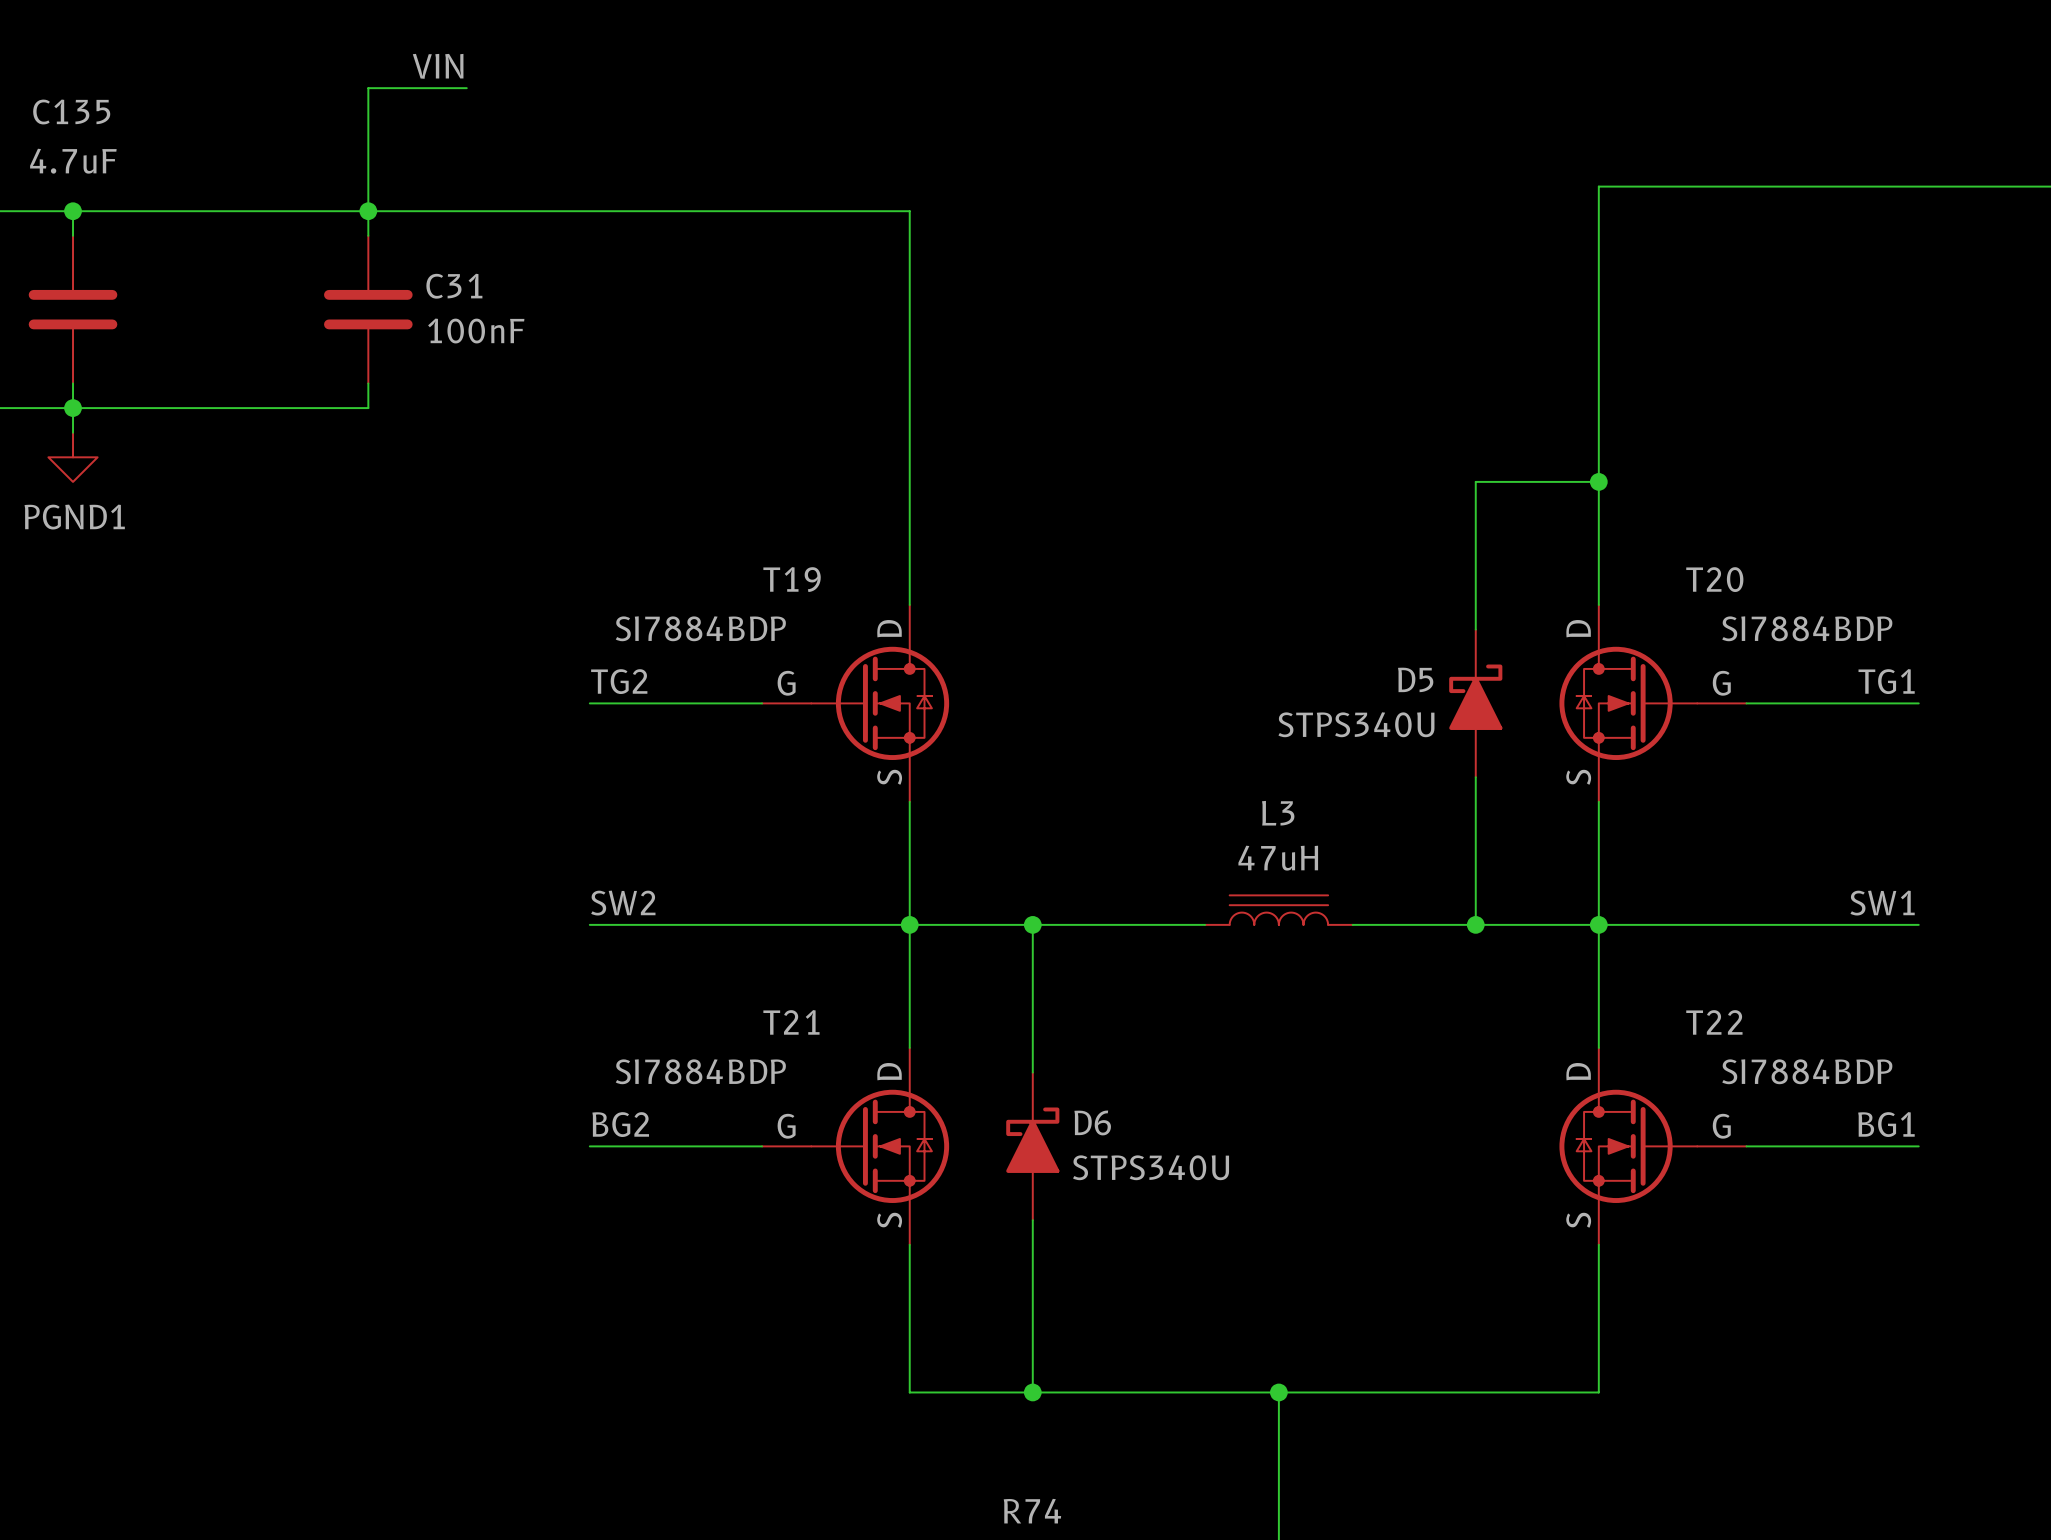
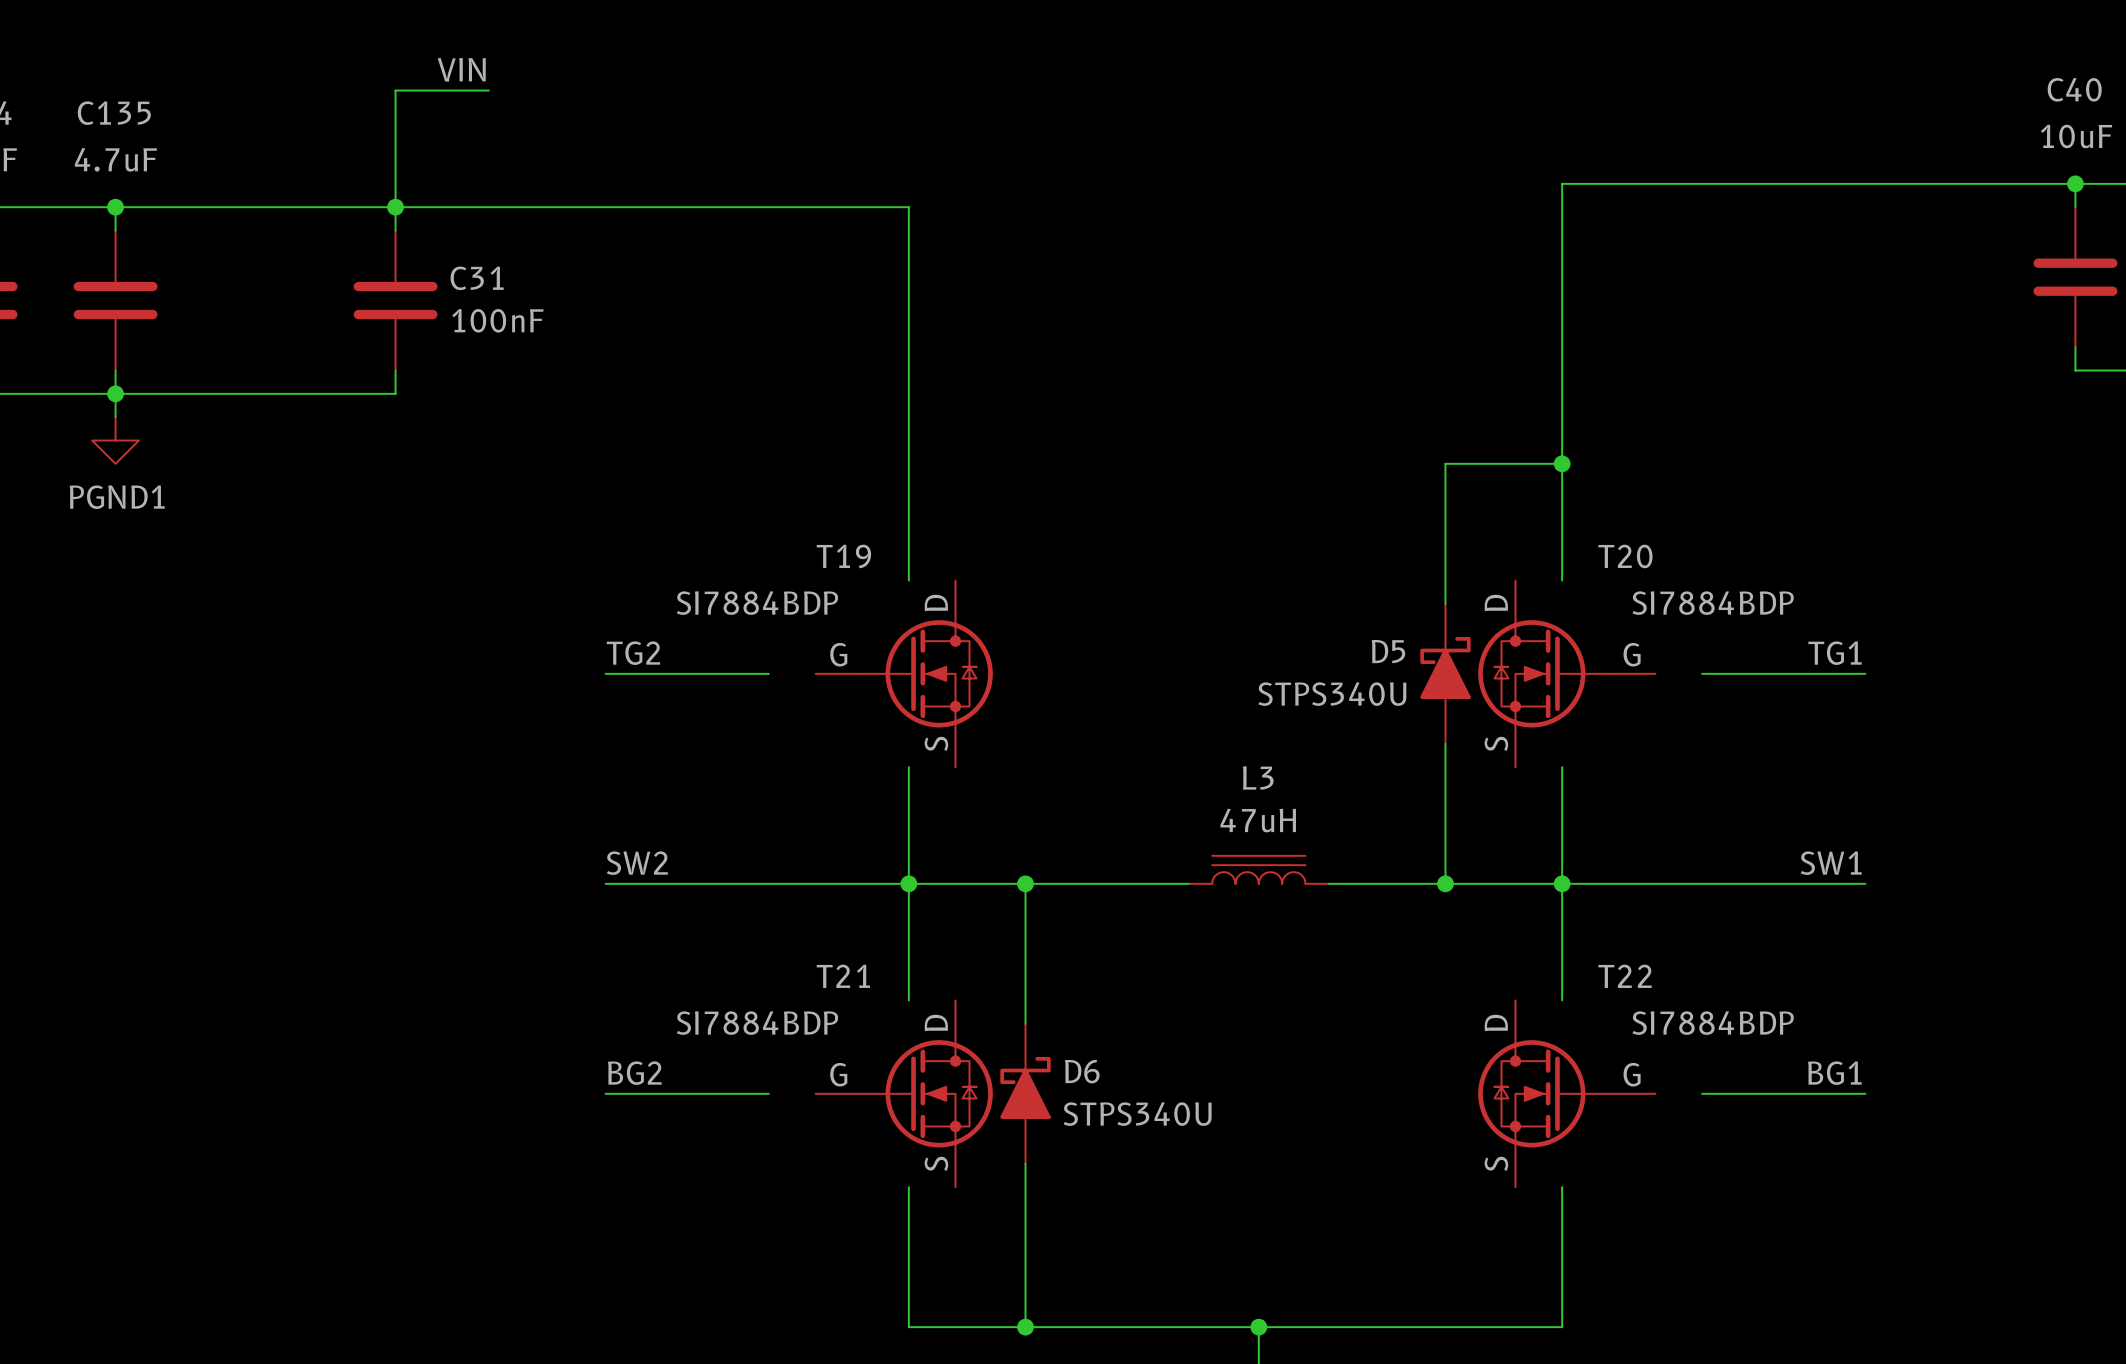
T19 position: (855, 703) -> (904, 673)
T20 position: (1652, 703) -> (1566, 673)
T21 position: (855, 1146) -> (904, 1093)
T22 position: (1652, 1146) -> (1566, 1093)

